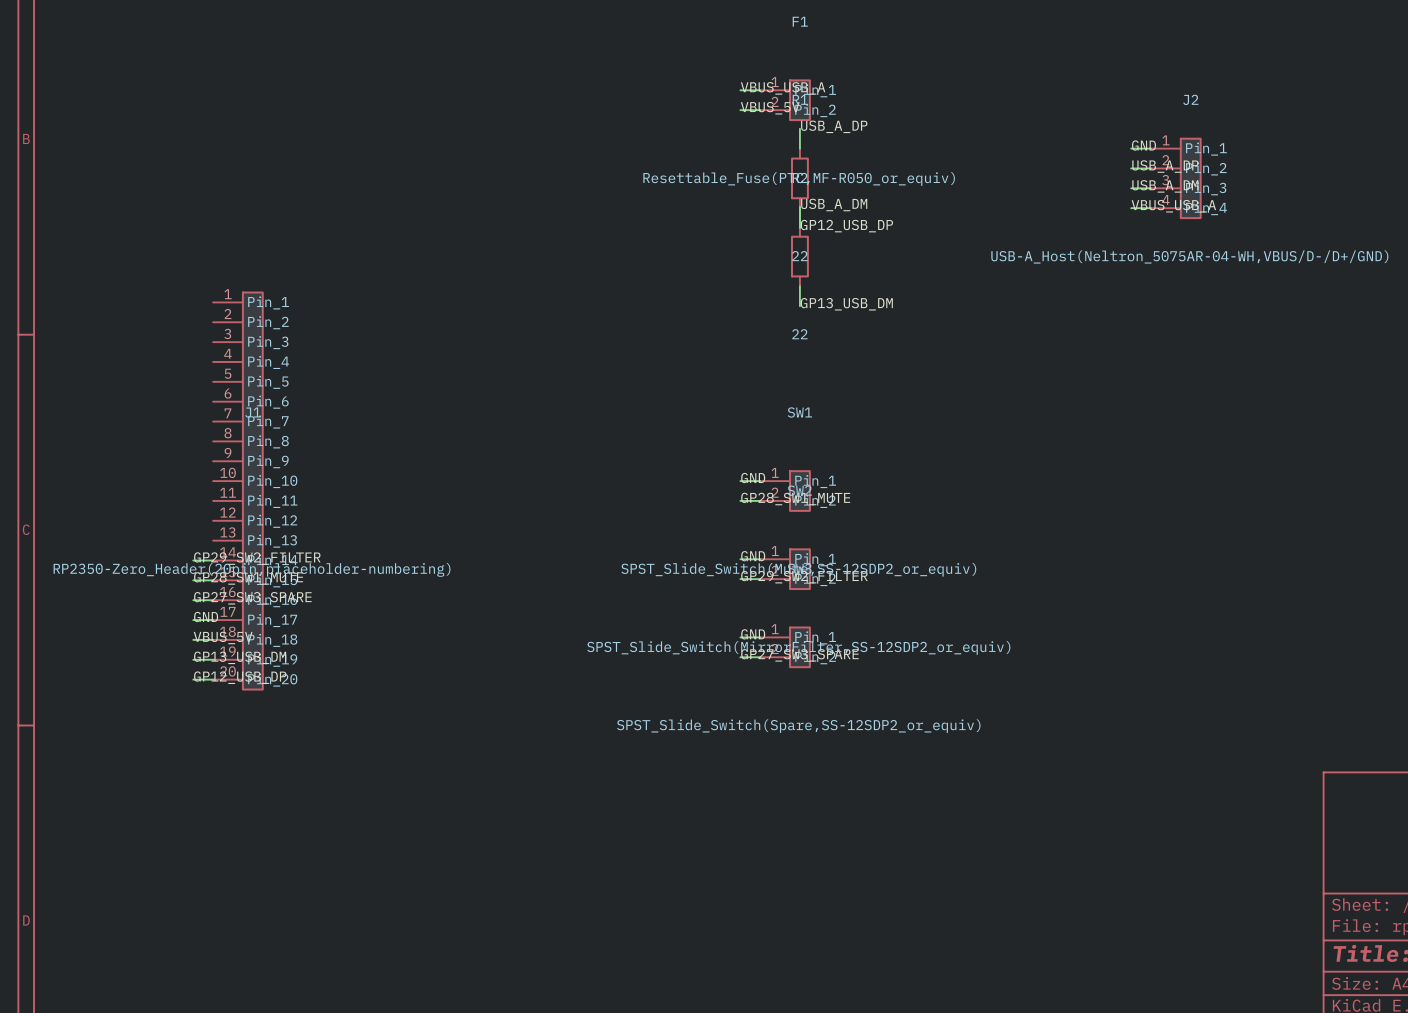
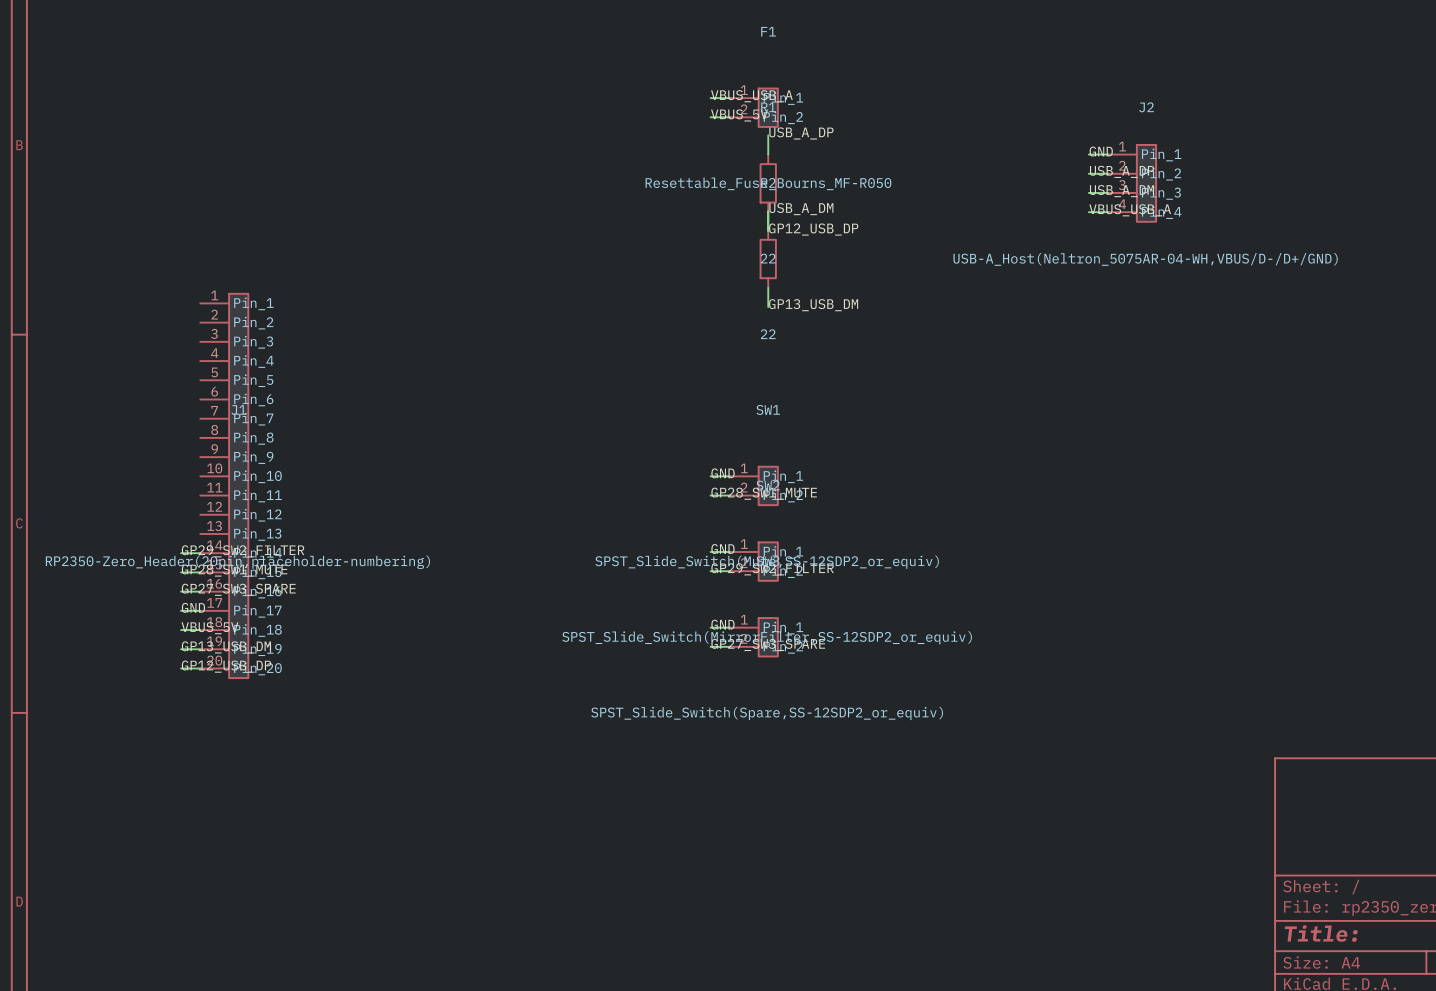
F1 value: Resettable_Fuse(PTC,MF-R050_or_equiv) (799, 179) -> Resettable_Fuse_Bourns_MF-R050 (768, 183)

